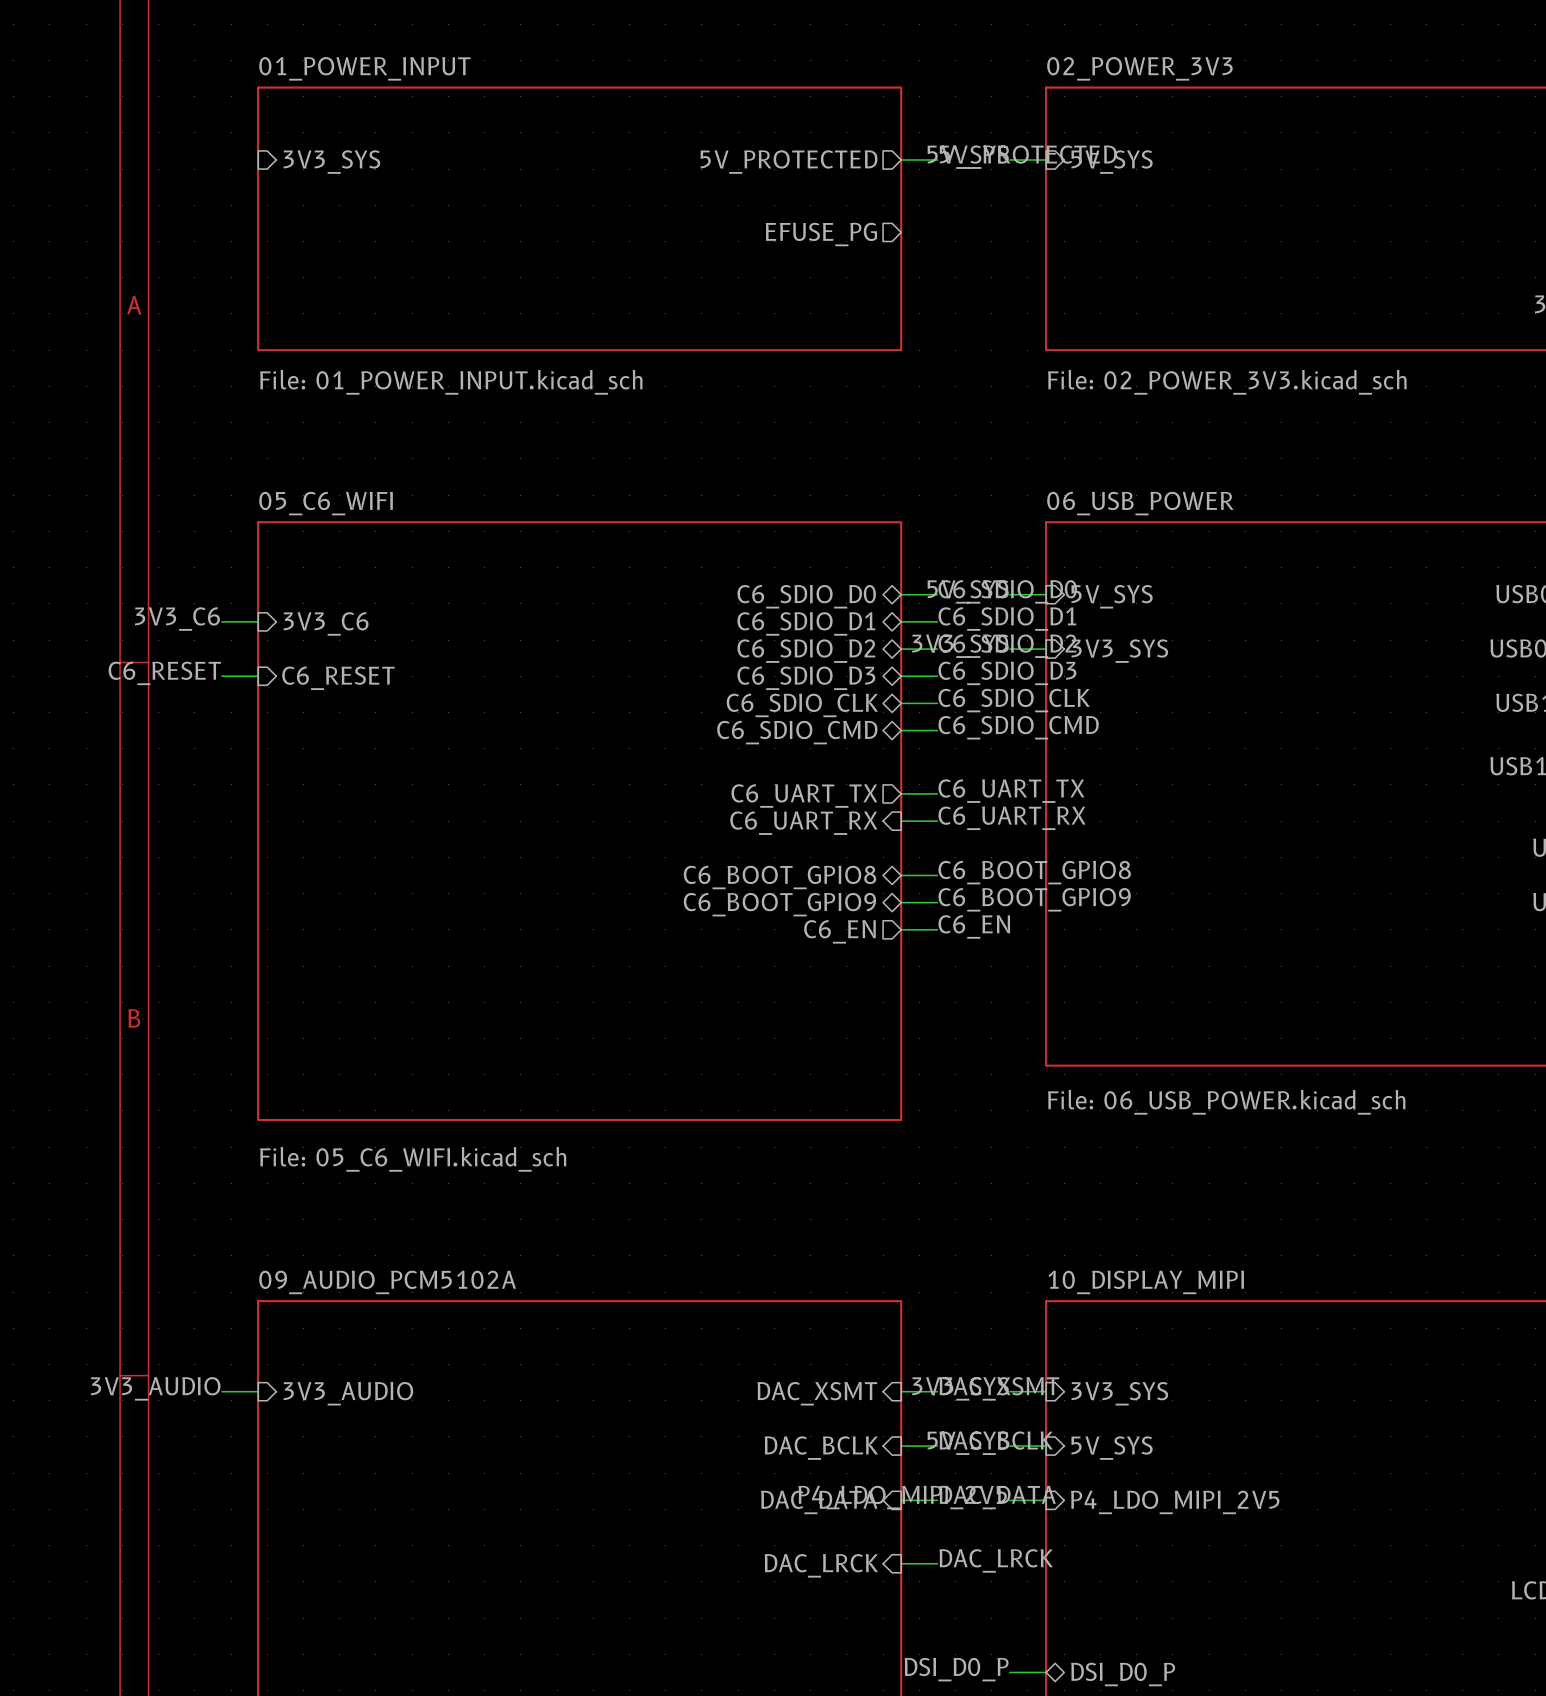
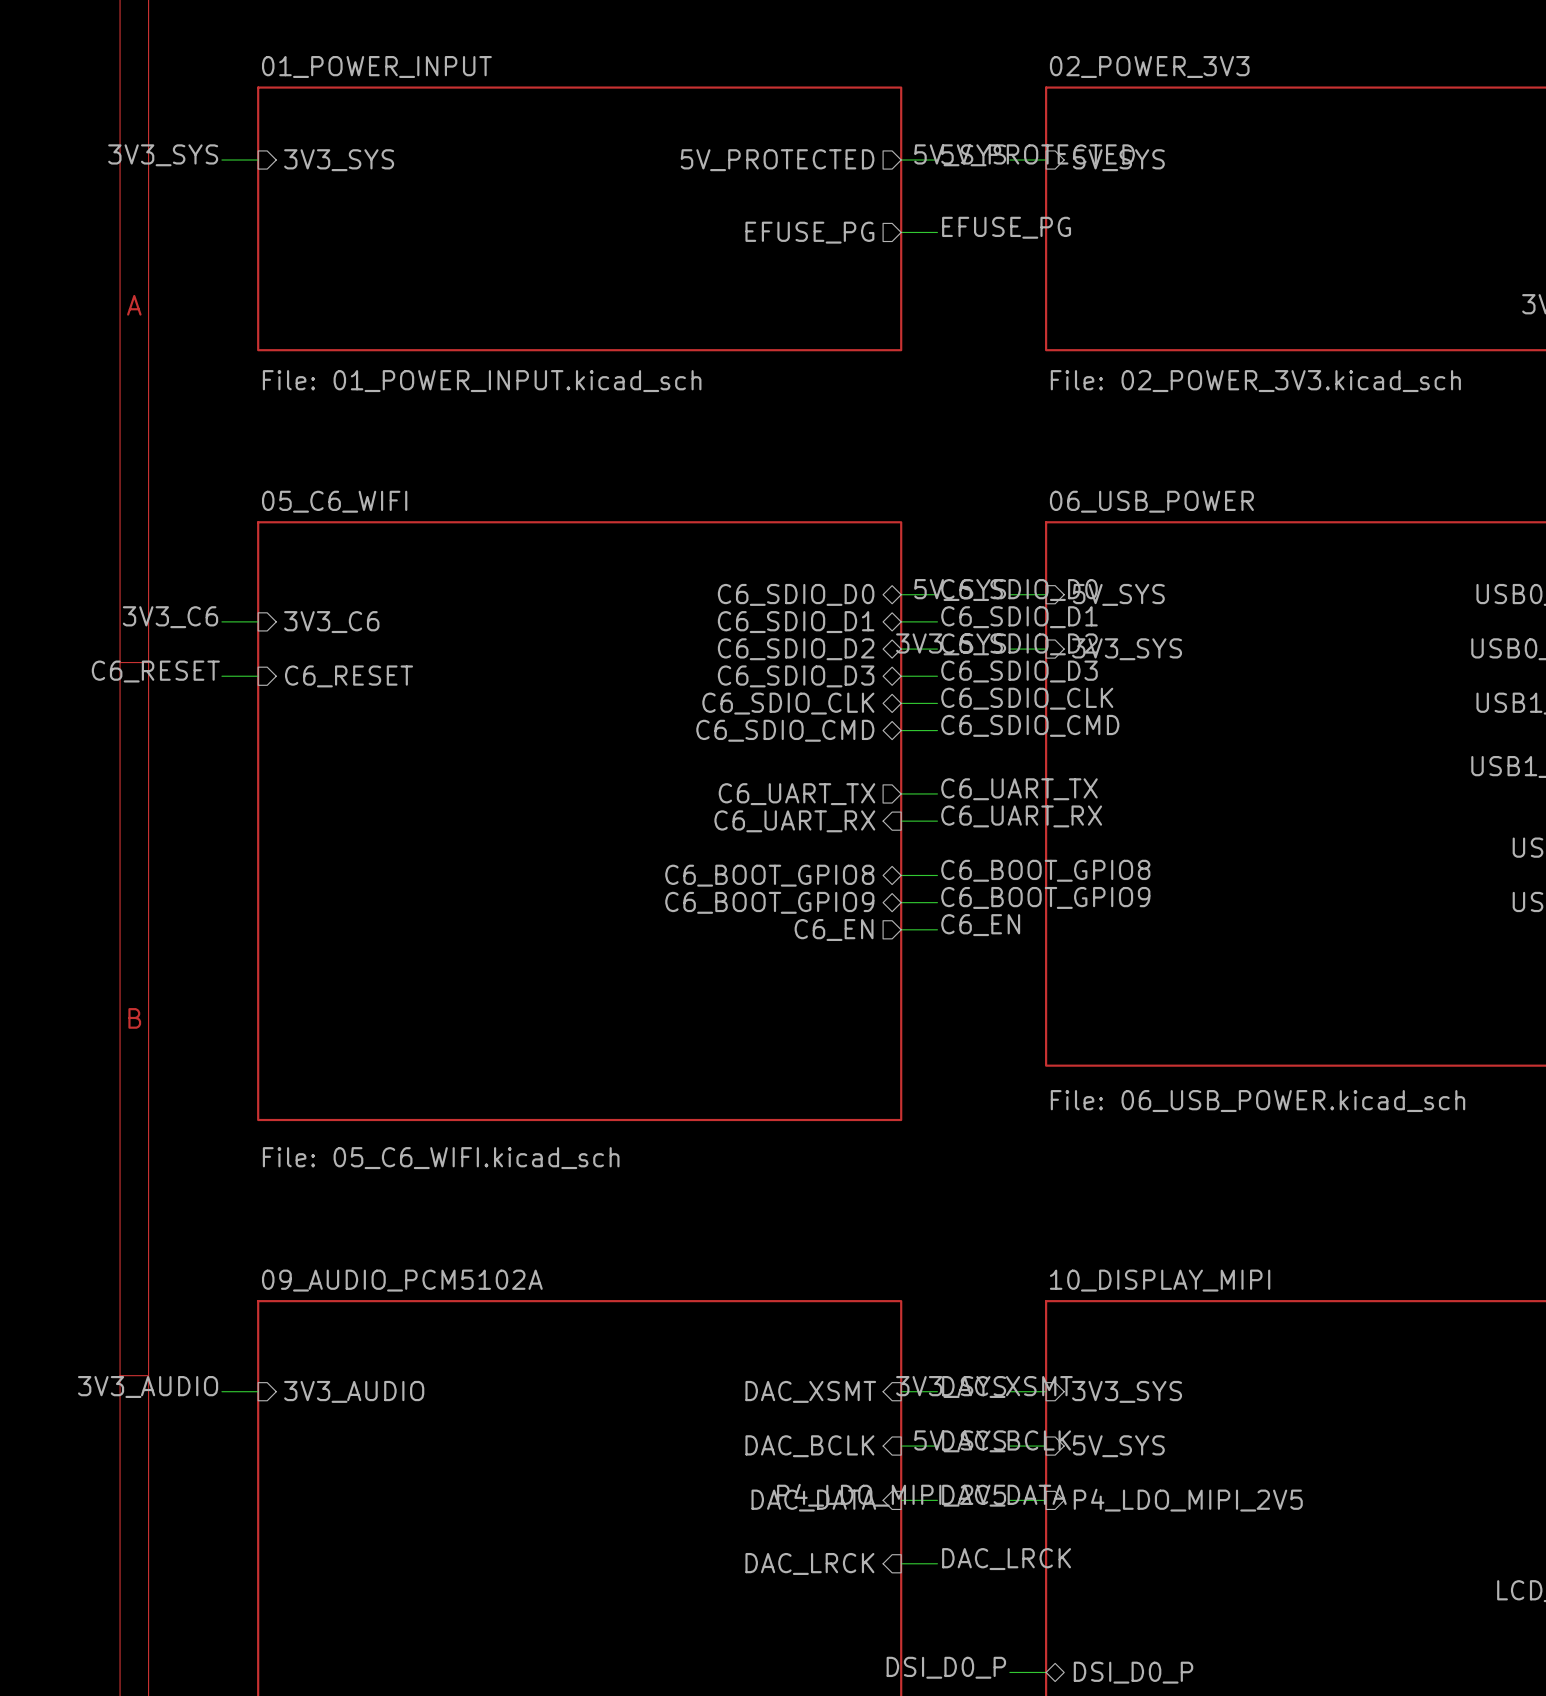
label: none -> 3V3_SYS (163, 155)
wire: none -> (221, 160) (258, 160)
label: none -> EFUSE_PG (1006, 227)
wire: none -> (901, 232) (937, 232)

